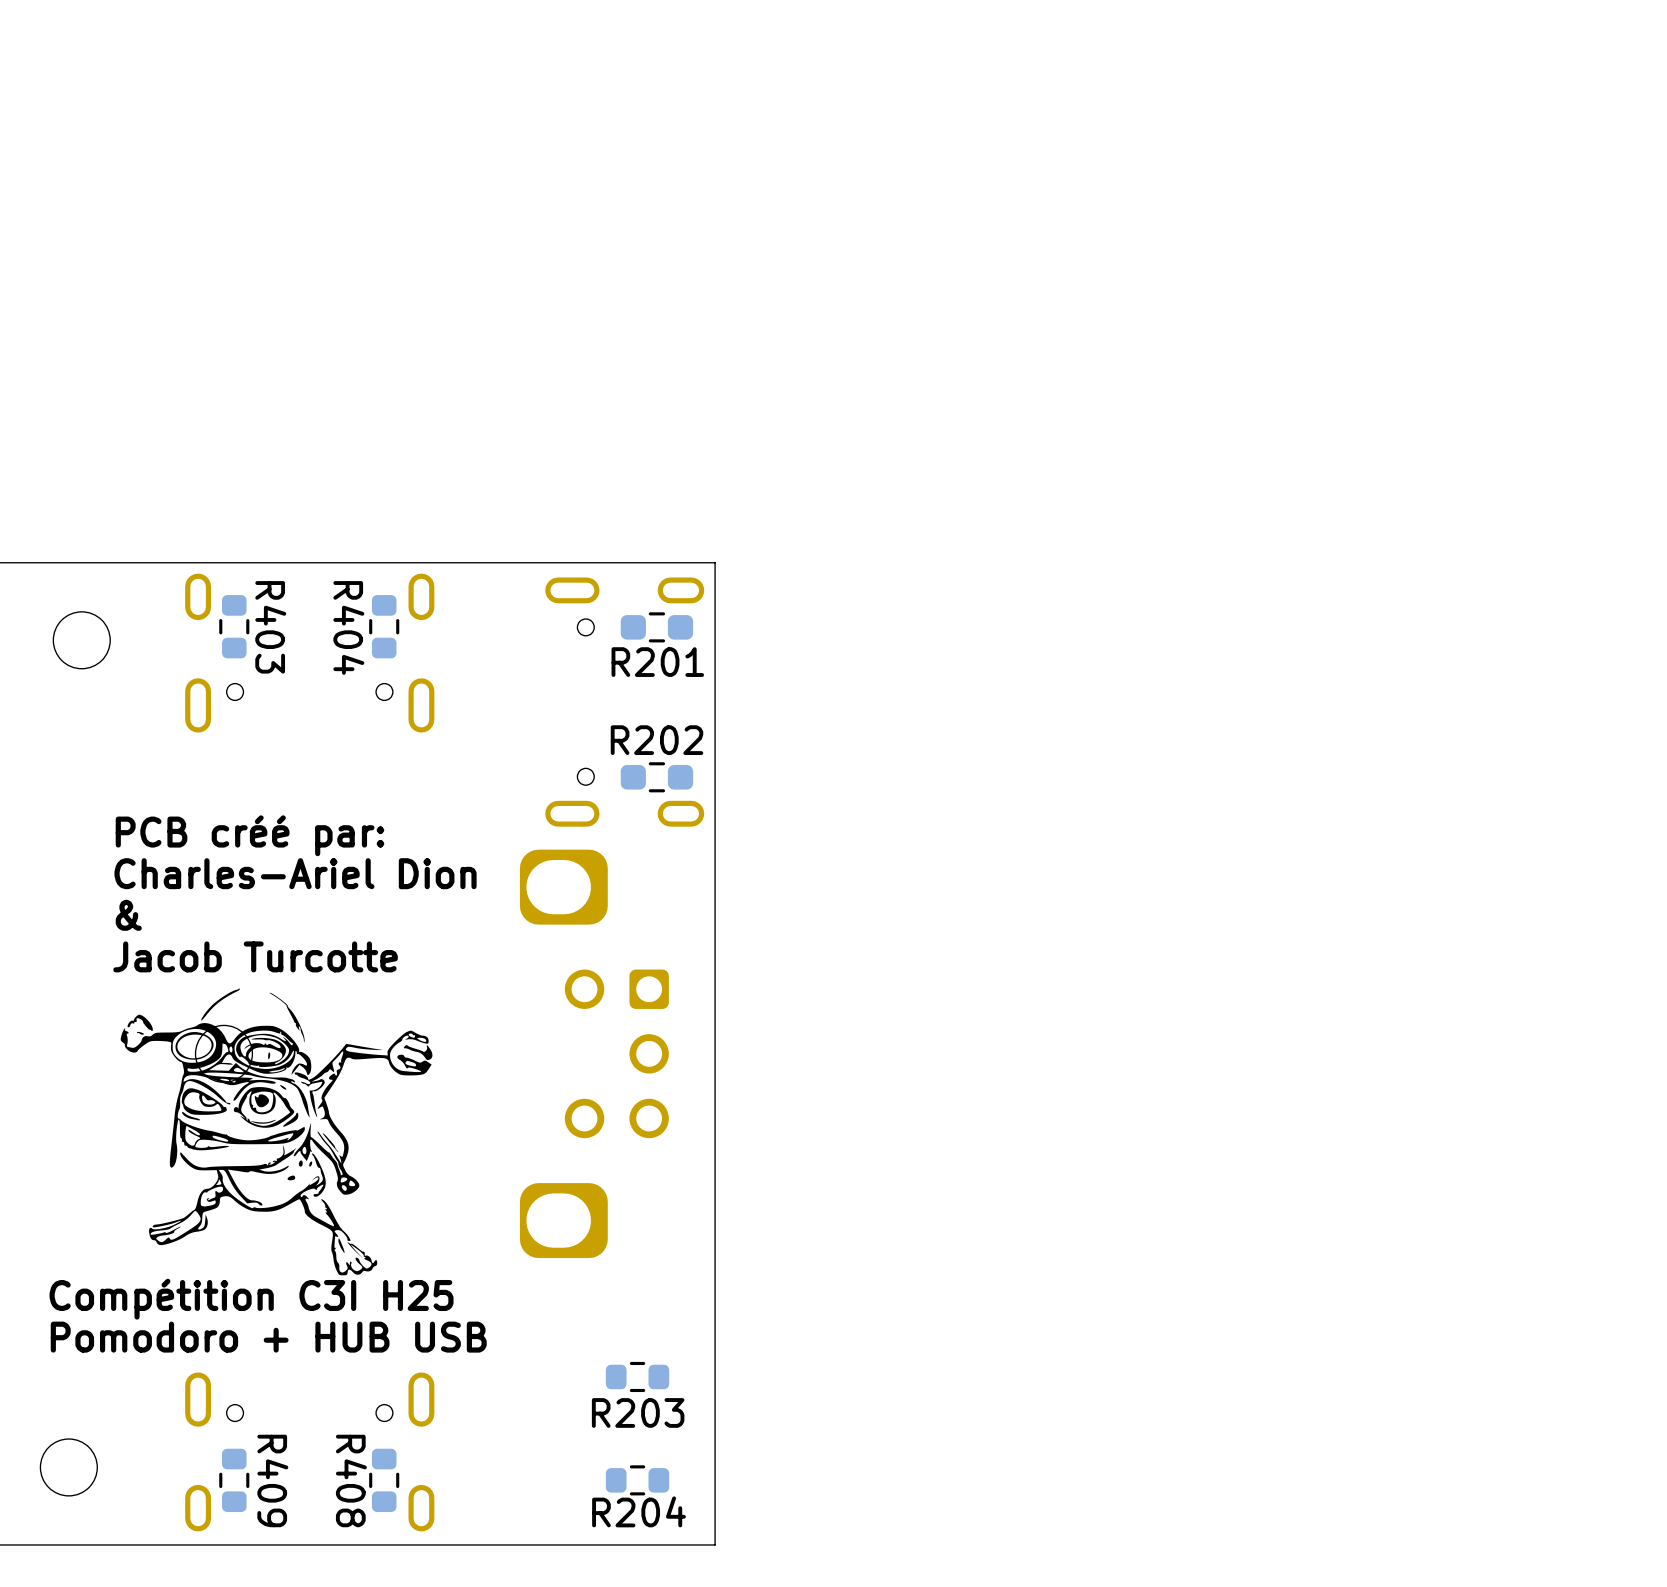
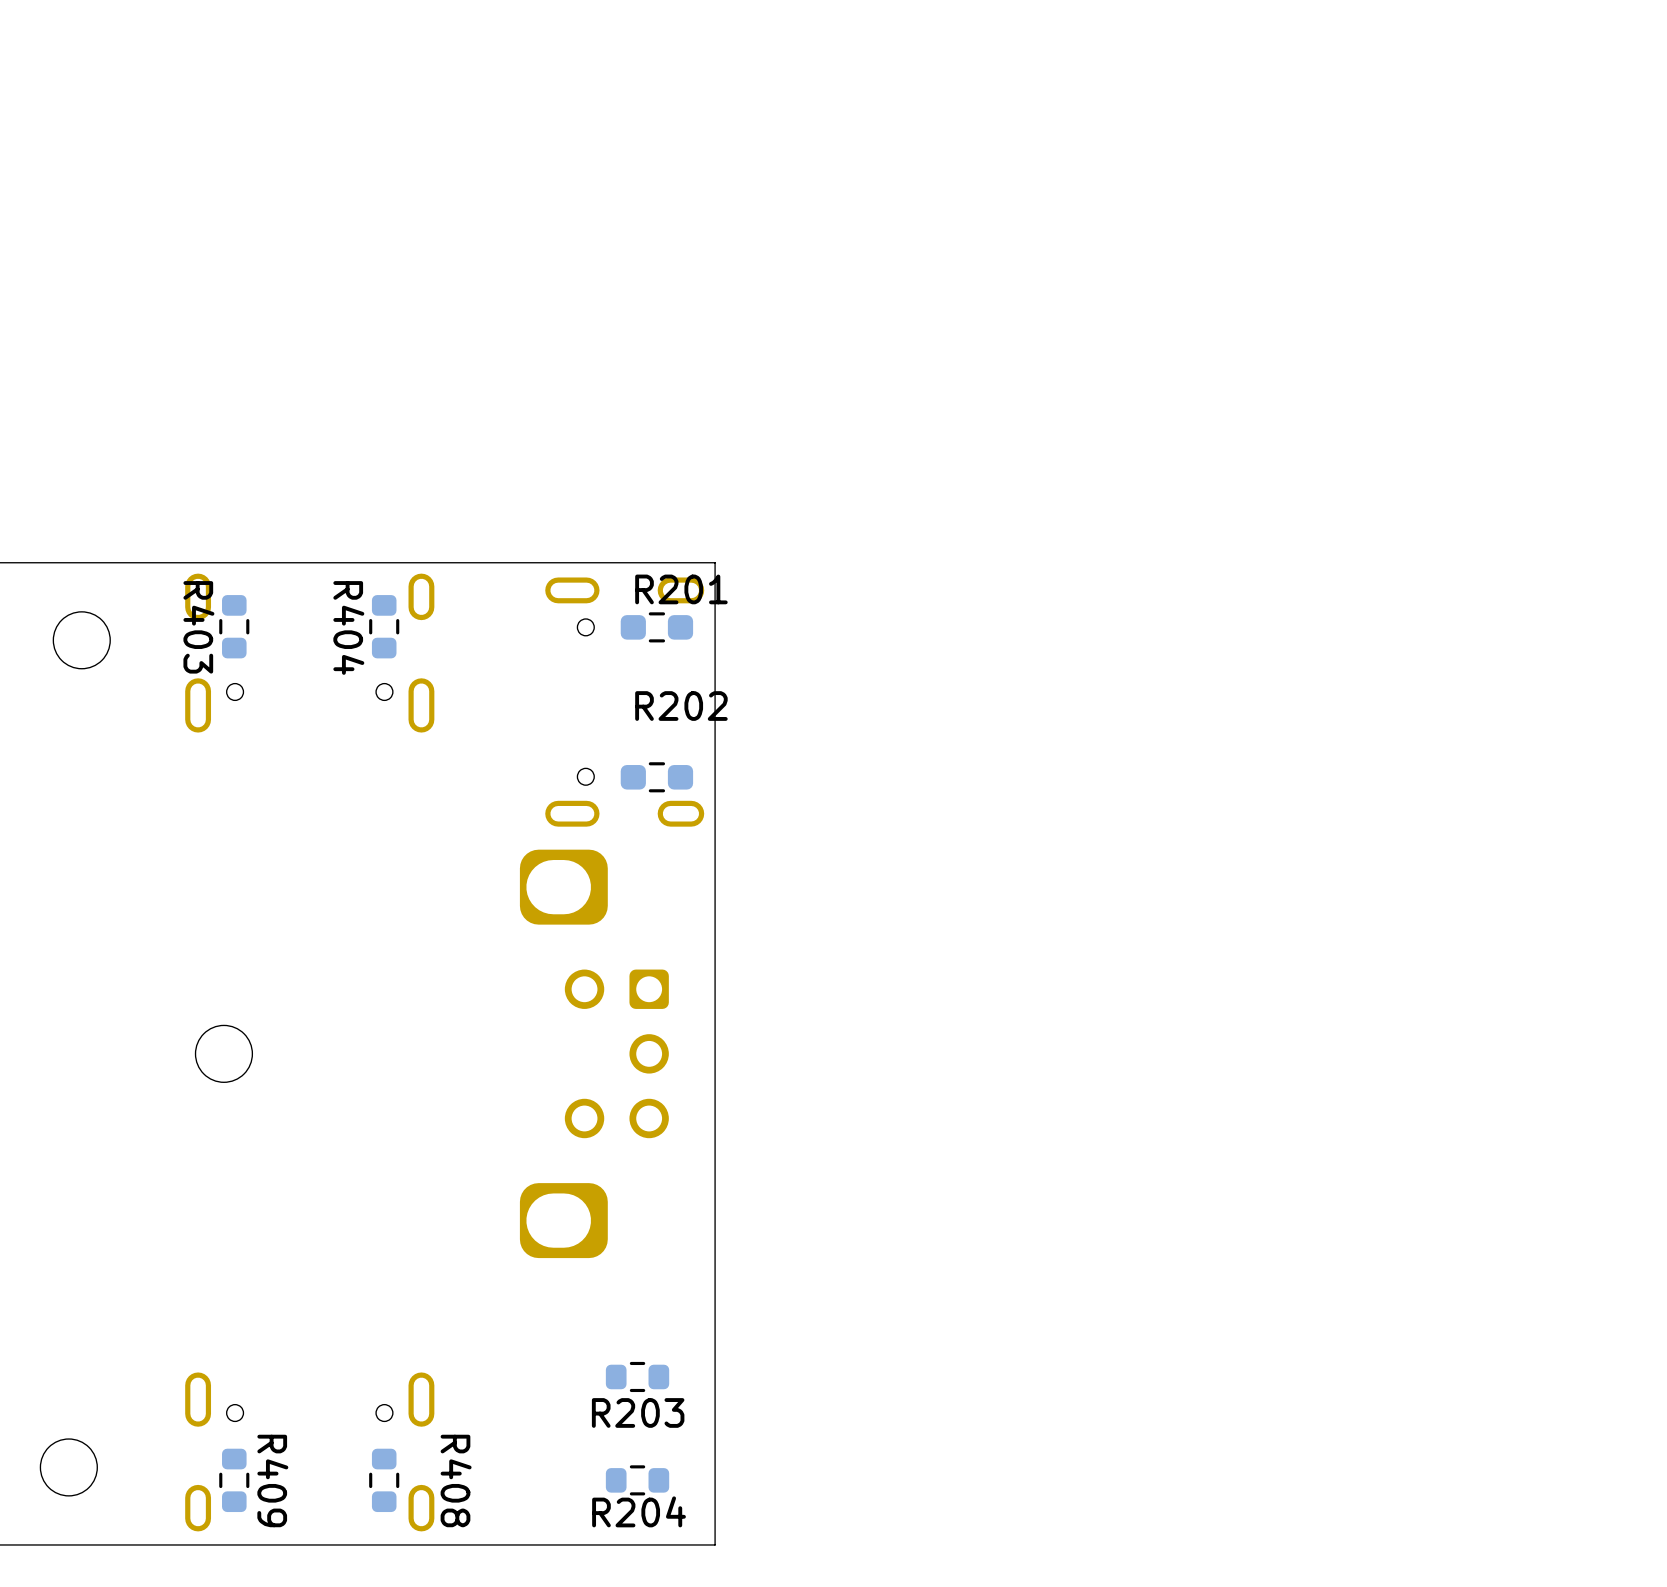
R403 name position: R403 (270, 627) -> R403 (198, 627)
R201 name position: R201 (657, 662) -> R201 (681, 589)
R202 name position: R202 (657, 740) -> R202 (681, 706)
text: PCB créé par: (250, 835) -> none
text: Charles-Ariel Dion (295, 873) -> none
text: & (128, 915) -> none
text: Jacob Turcotte (255, 956) -> none
drawing: [120, 988, 433, 1276] -> none
text: Compétition C3I H25 (251, 1299) -> none
text: Pomodoro + HUB USB (268, 1337) -> none
R408 name position: R408 (351, 1480) -> R408 (456, 1480)

